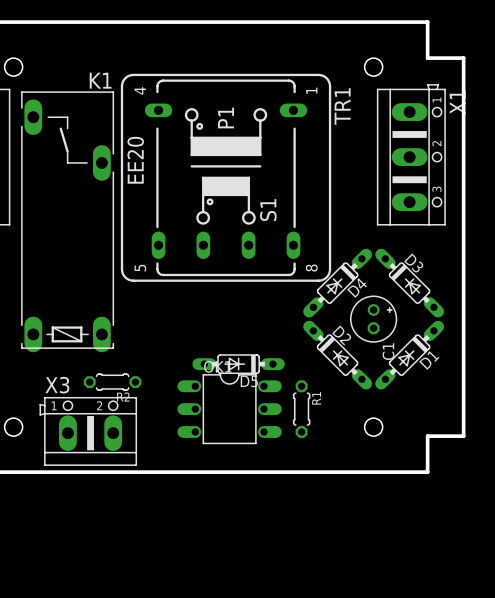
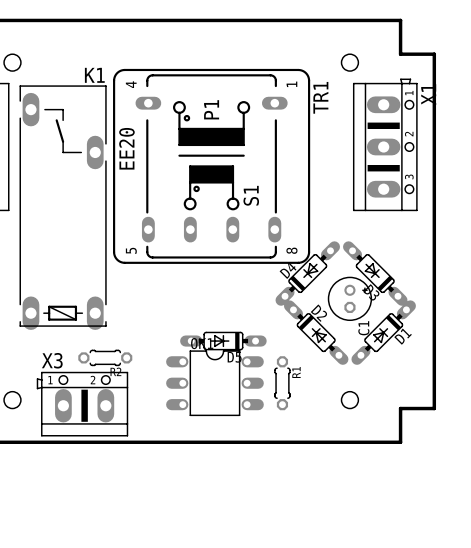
D4 rotation: 0° (337, 283) -> 180° (307, 273)
D3 rotation: 0° (409, 283) -> 180° (375, 273)

